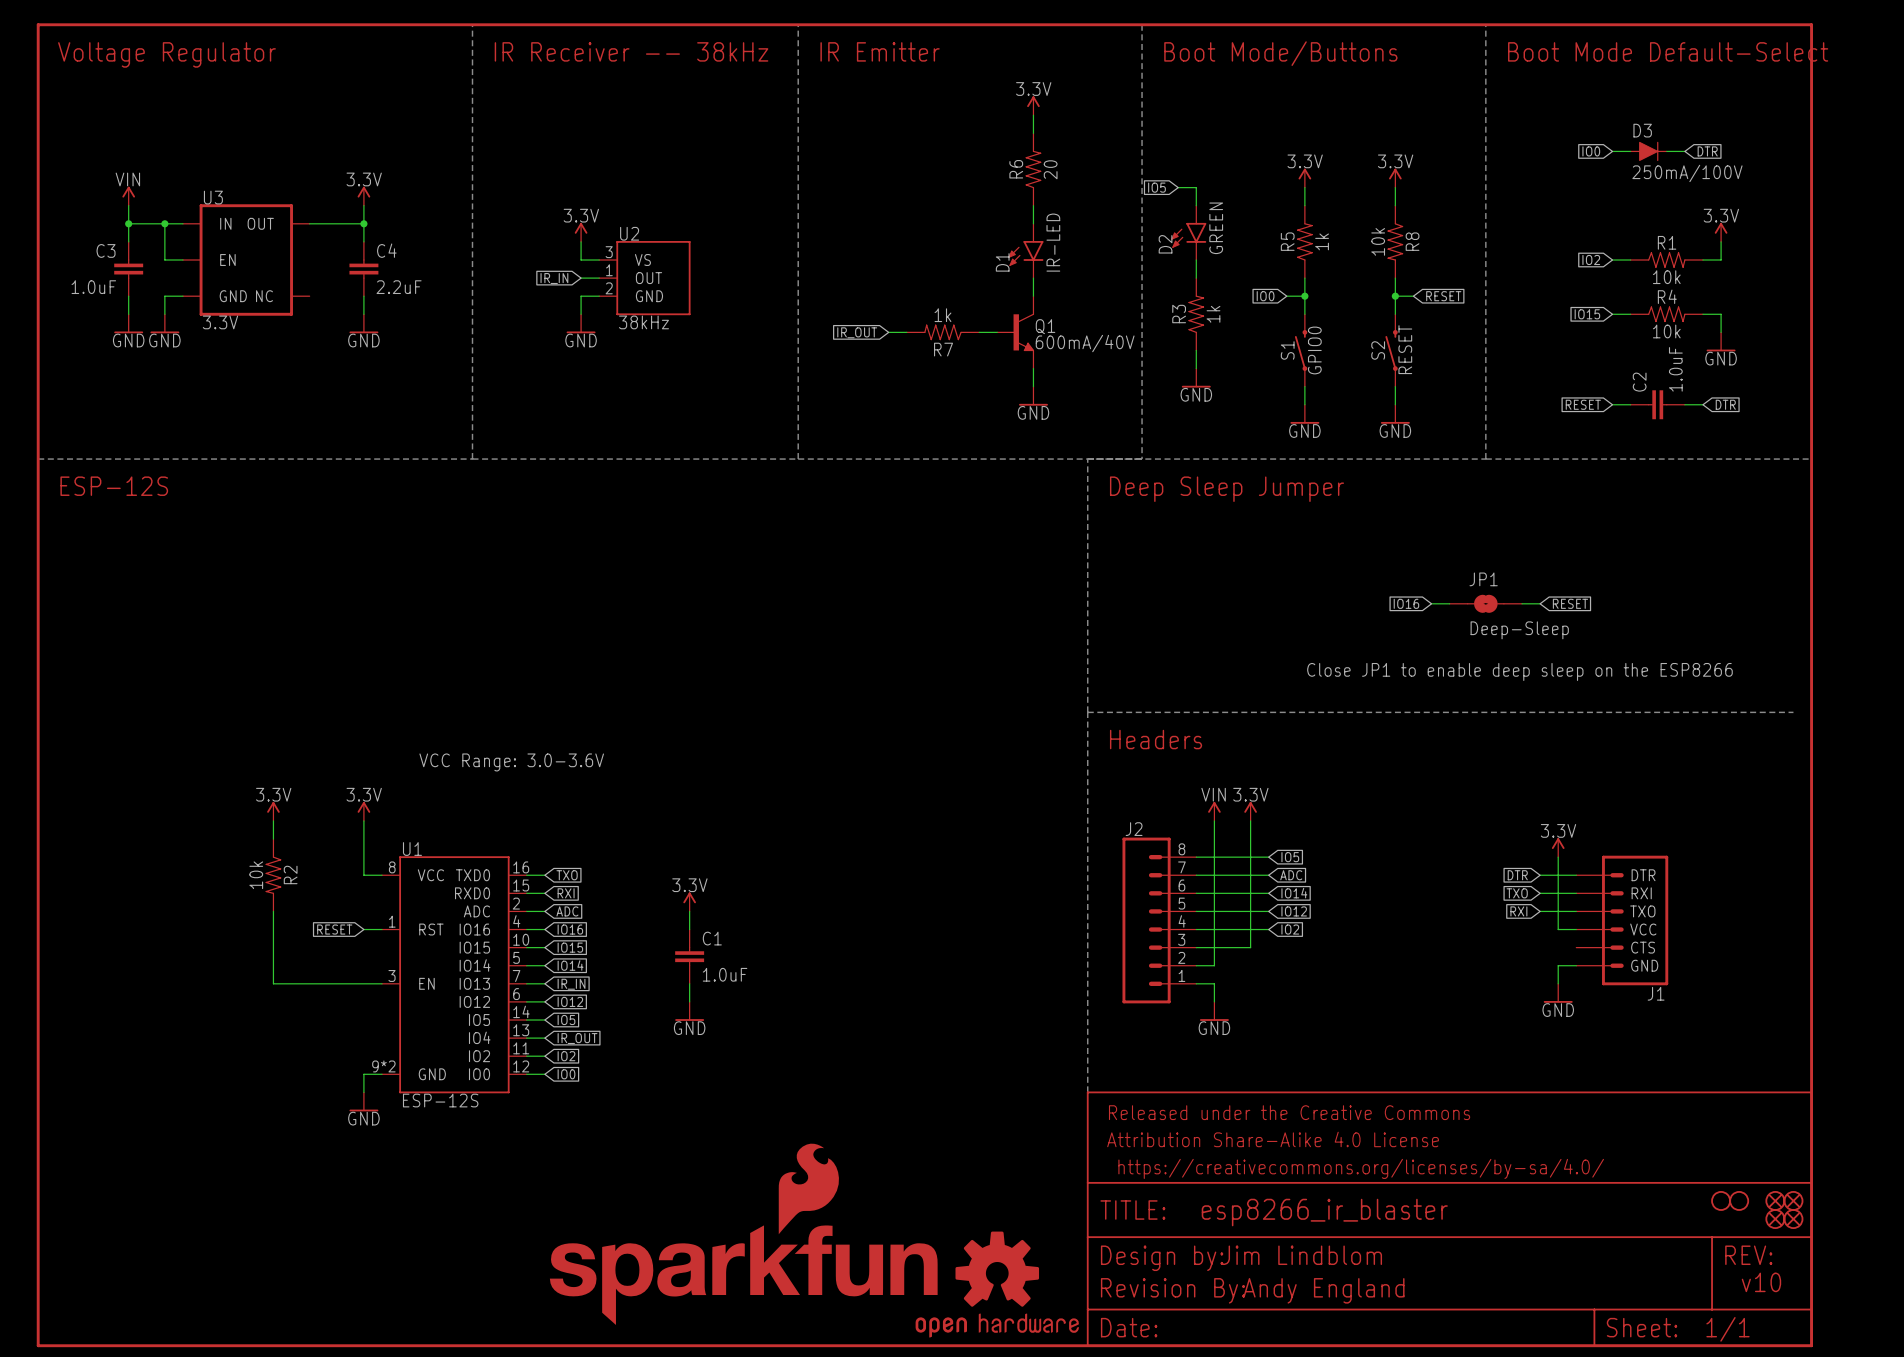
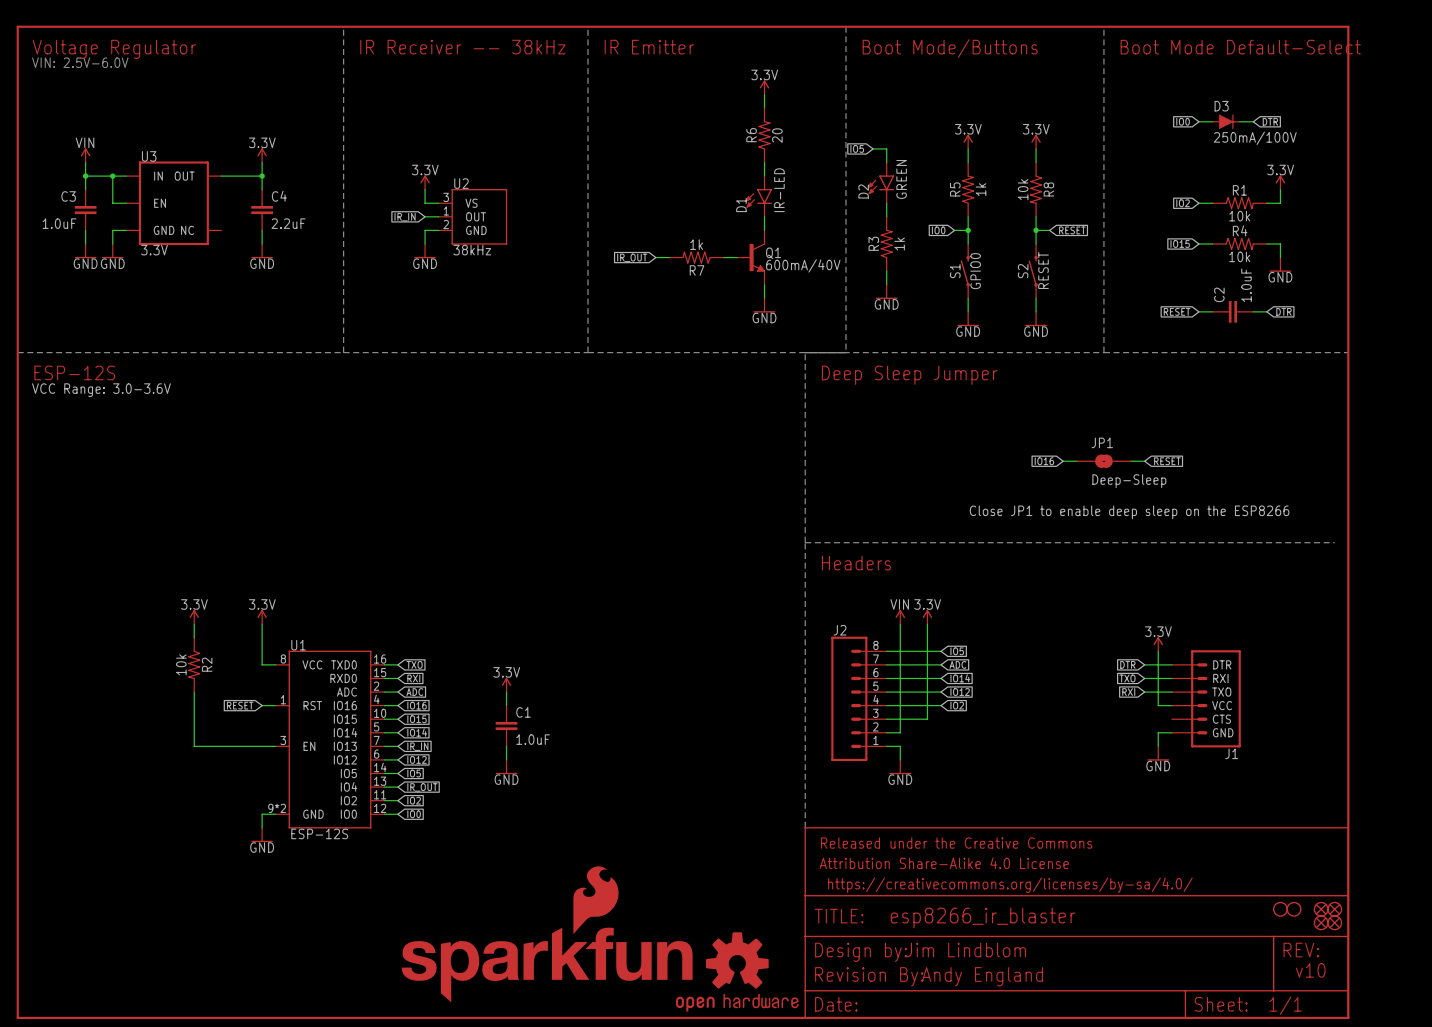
text: none -> VIN: 2.5V-6.0V (80, 62)
text: none -> VCC Range: 3.0-3.6V (101, 390)
text: VCC Range: 3.0-3.6V (511, 762) -> none

